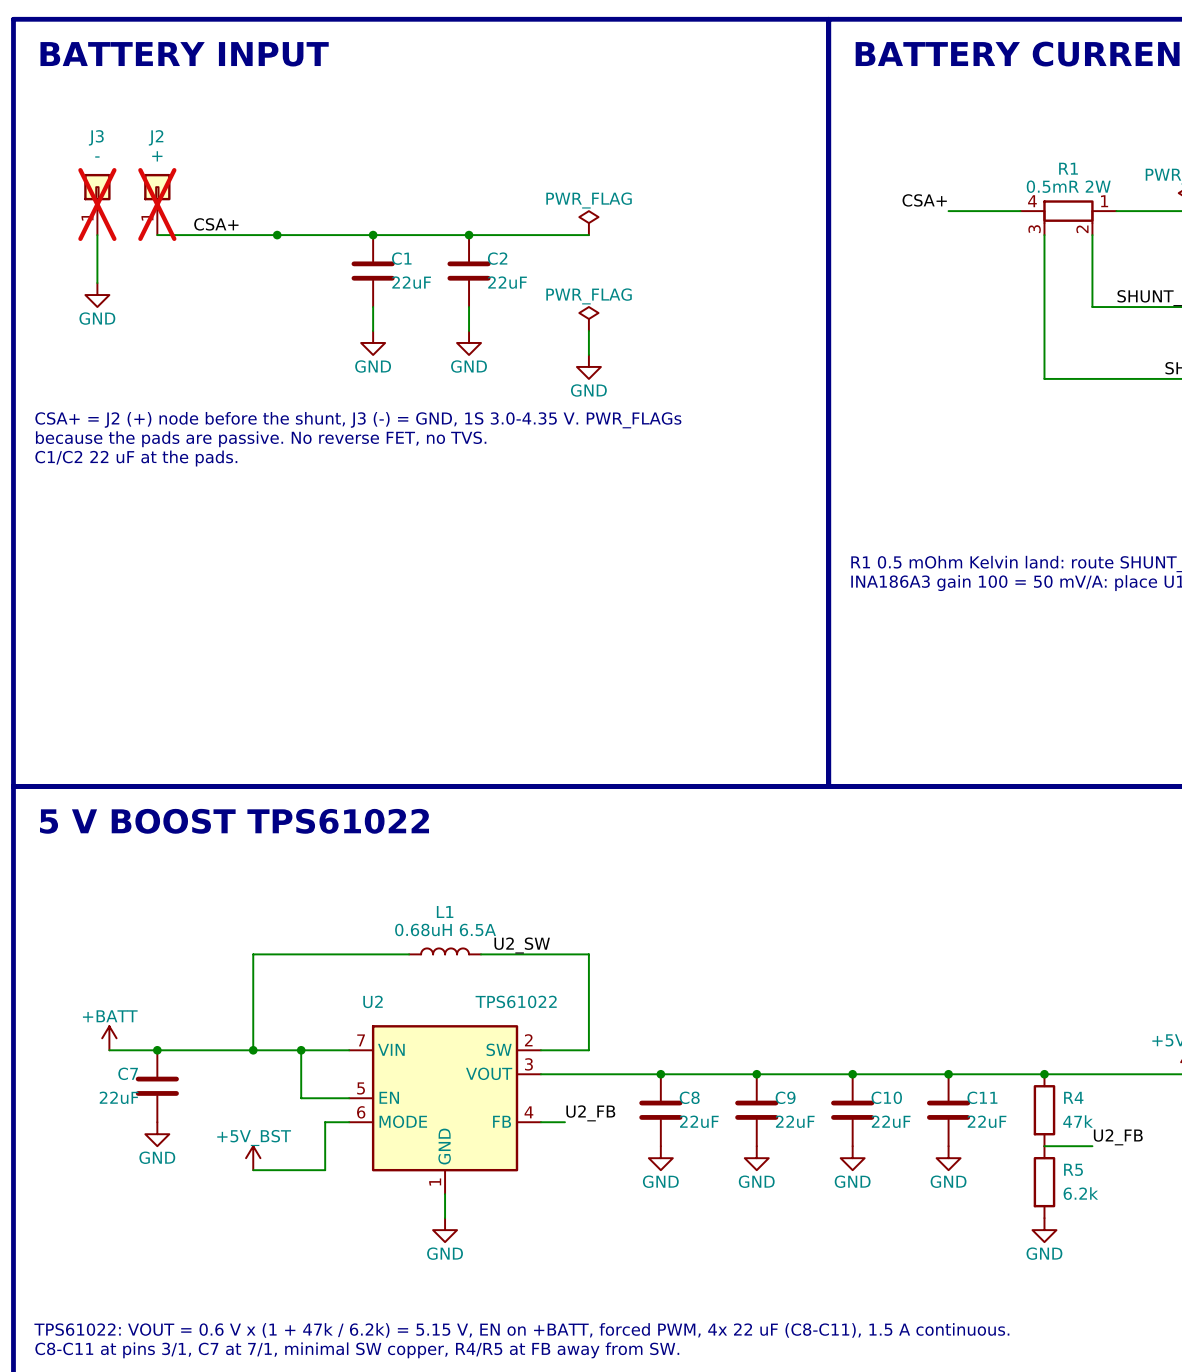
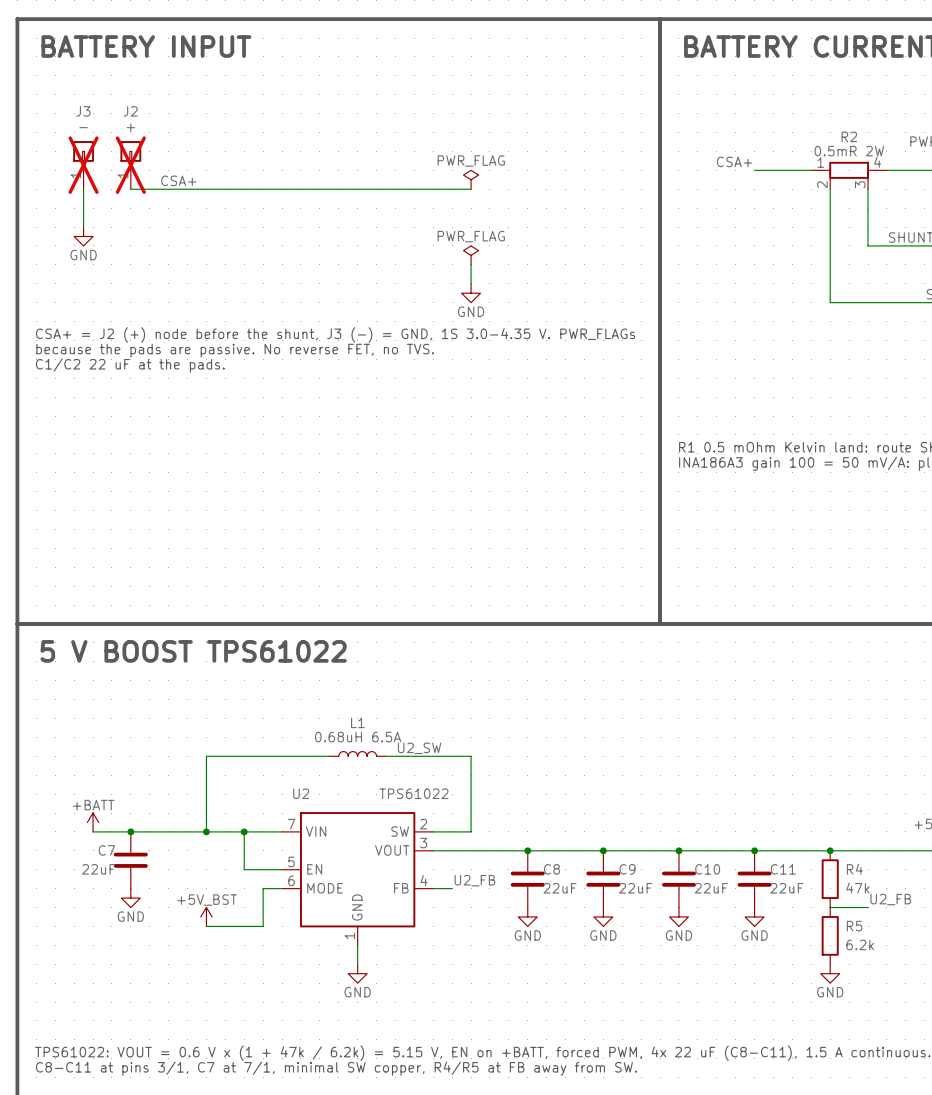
R1 name: R1 (1068, 168) -> R2 (849, 136)
R1 flip: as is (1068, 211) -> left-right (849, 170)
junction: (277, 235) -> none
junction: (373, 235) -> none
junction: (469, 235) -> none
C1: 22uF (373, 271) -> none
C2: 22uF (469, 271) -> none
wire: (373, 307) (373, 330) -> none
wire: (469, 307) (469, 330) -> none
power symbol: GND (373, 342) -> none
power symbol: GND (469, 342) -> none

